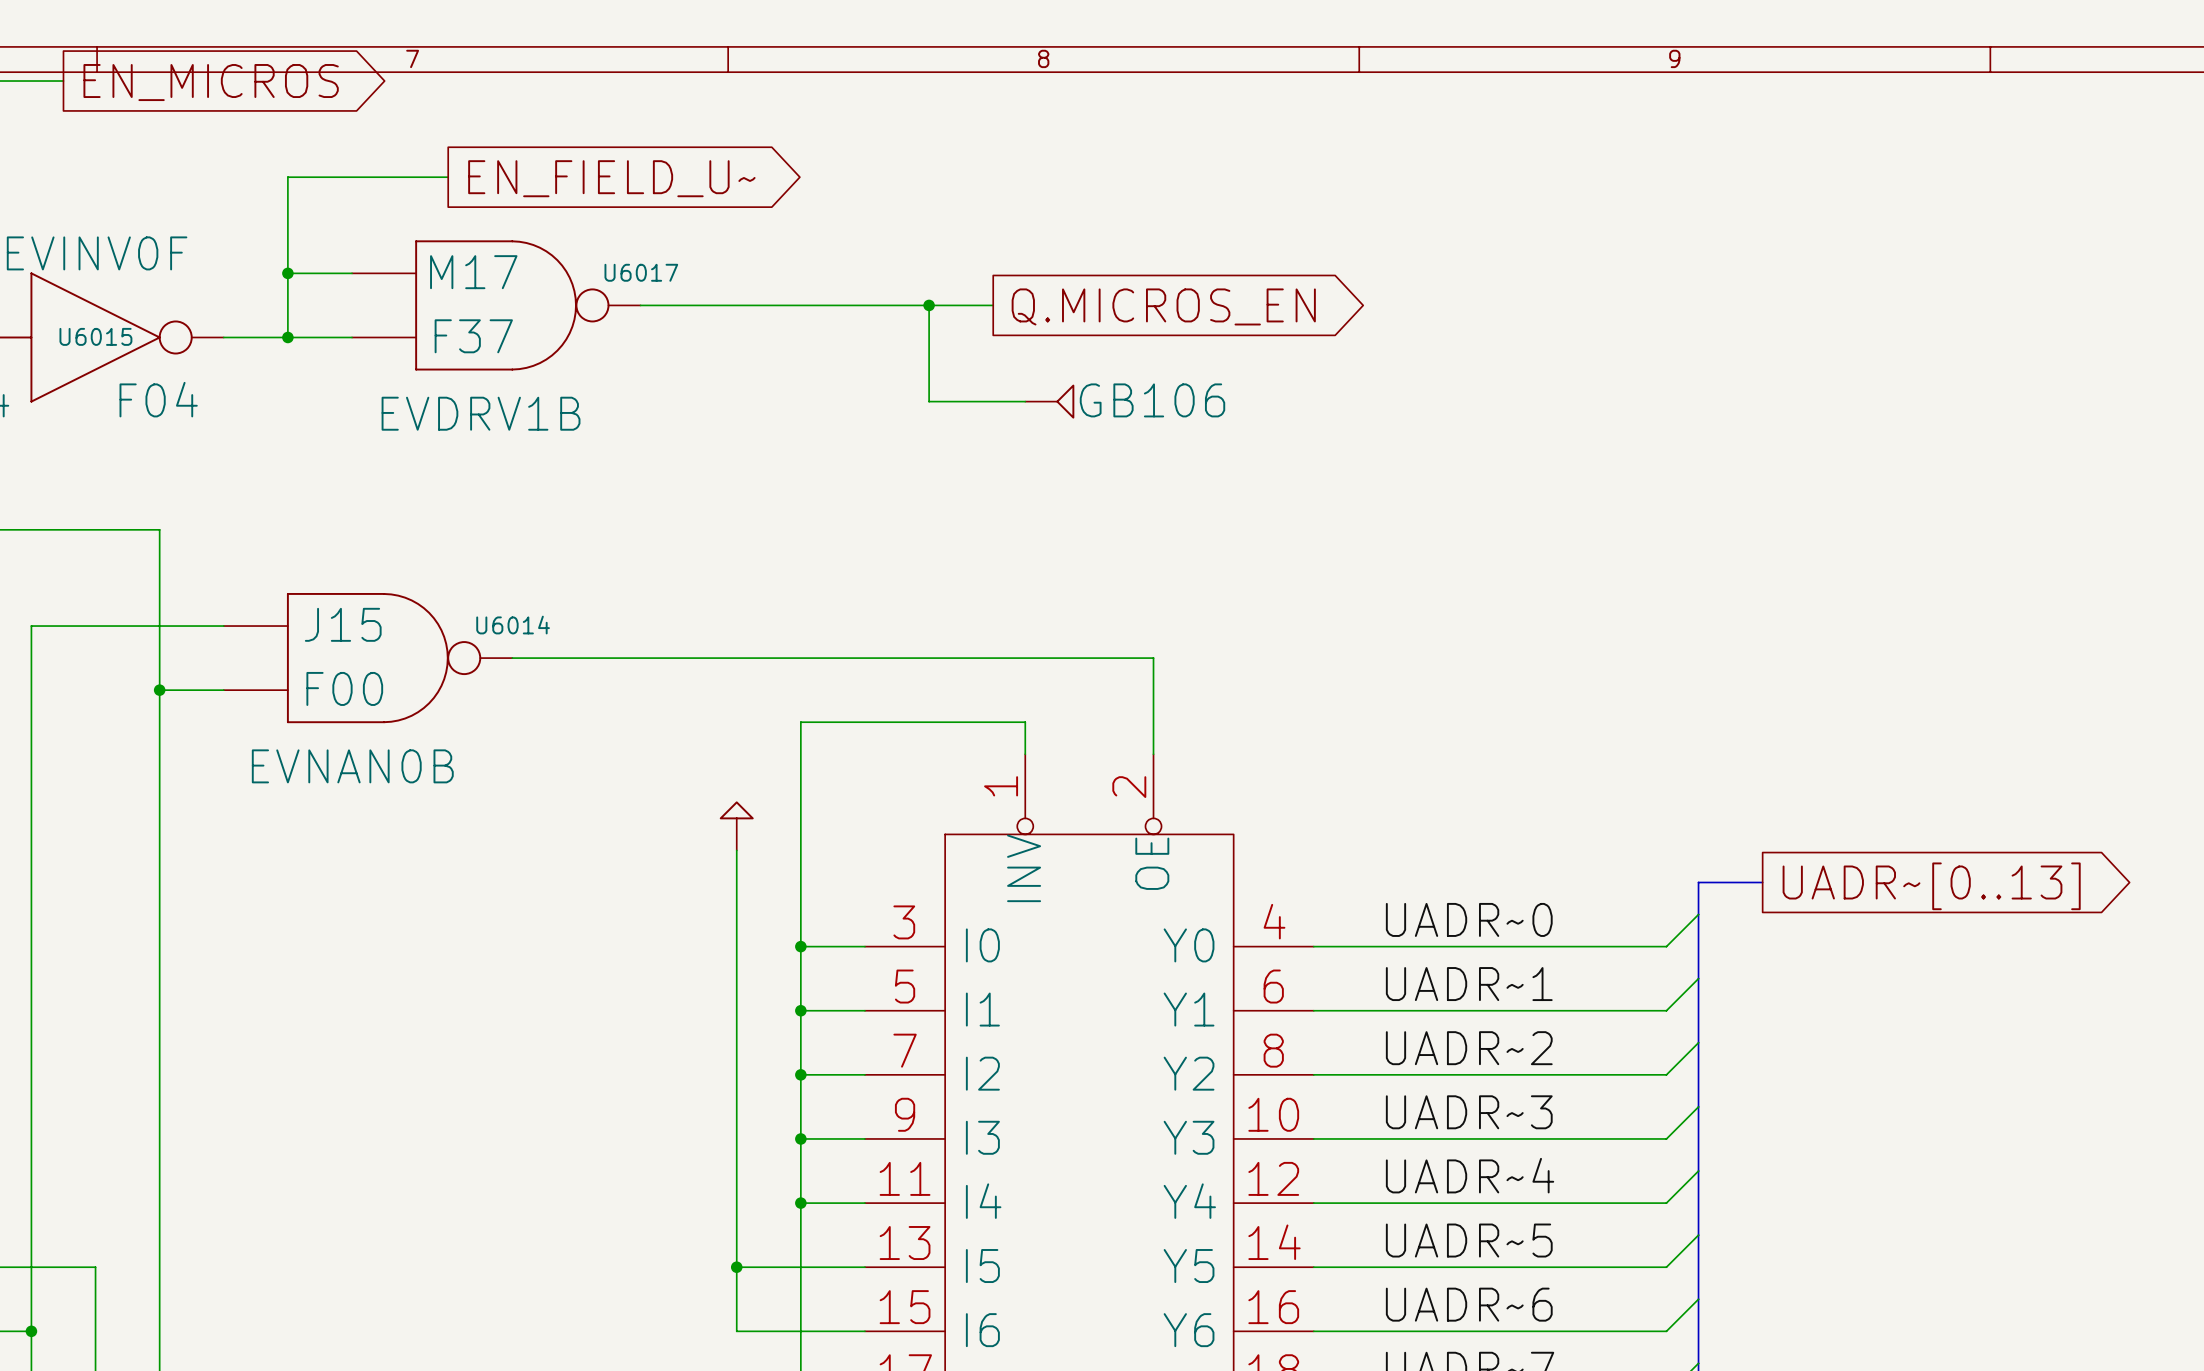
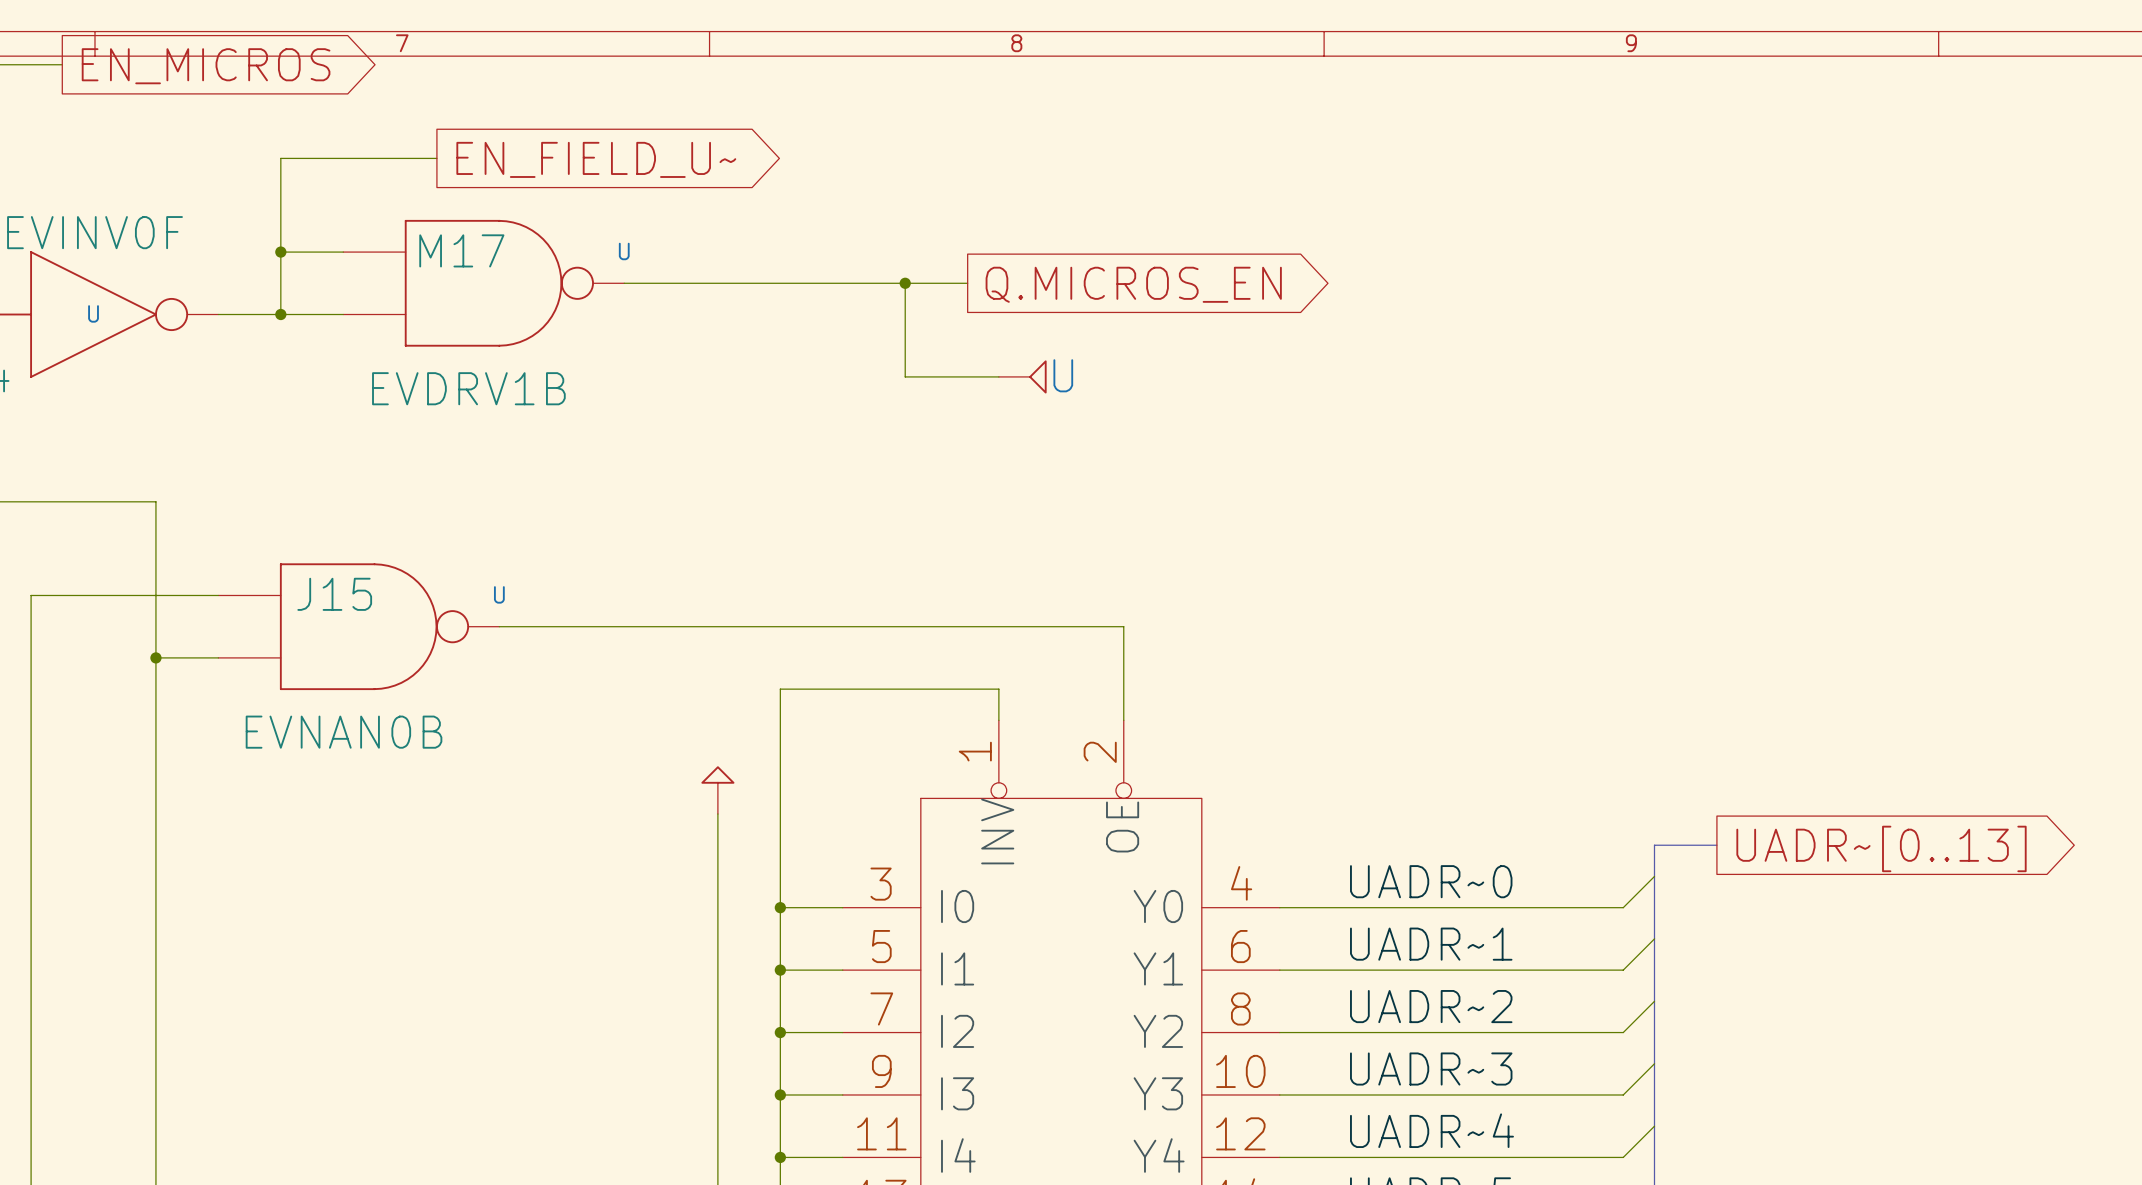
U6017 name: U6017 (641, 272) -> U (624, 251)
U6015 name: U6015 (95, 336) -> U (93, 313)
U6017 value: F37 (473, 336) -> none
U6015 value: F04 (158, 399) -> none
GB106 name: GB106 (1152, 400) -> U (1063, 375)
U6014 name: U6014 (513, 625) -> U (499, 594)
U6014 value: F00 (344, 688) -> none

